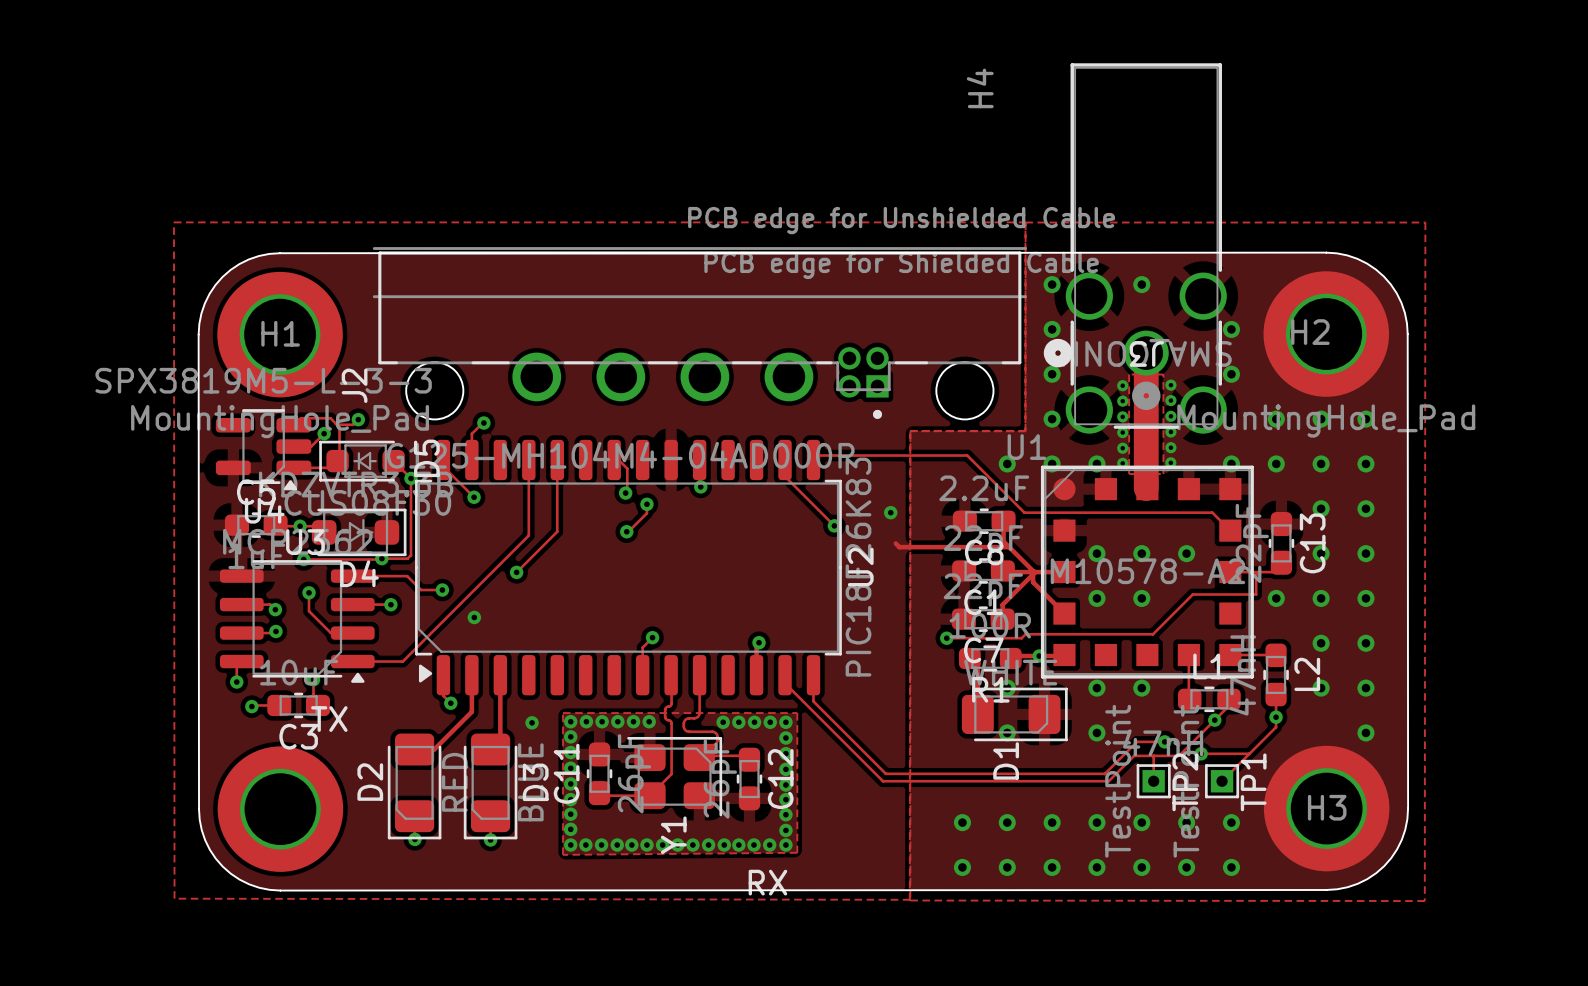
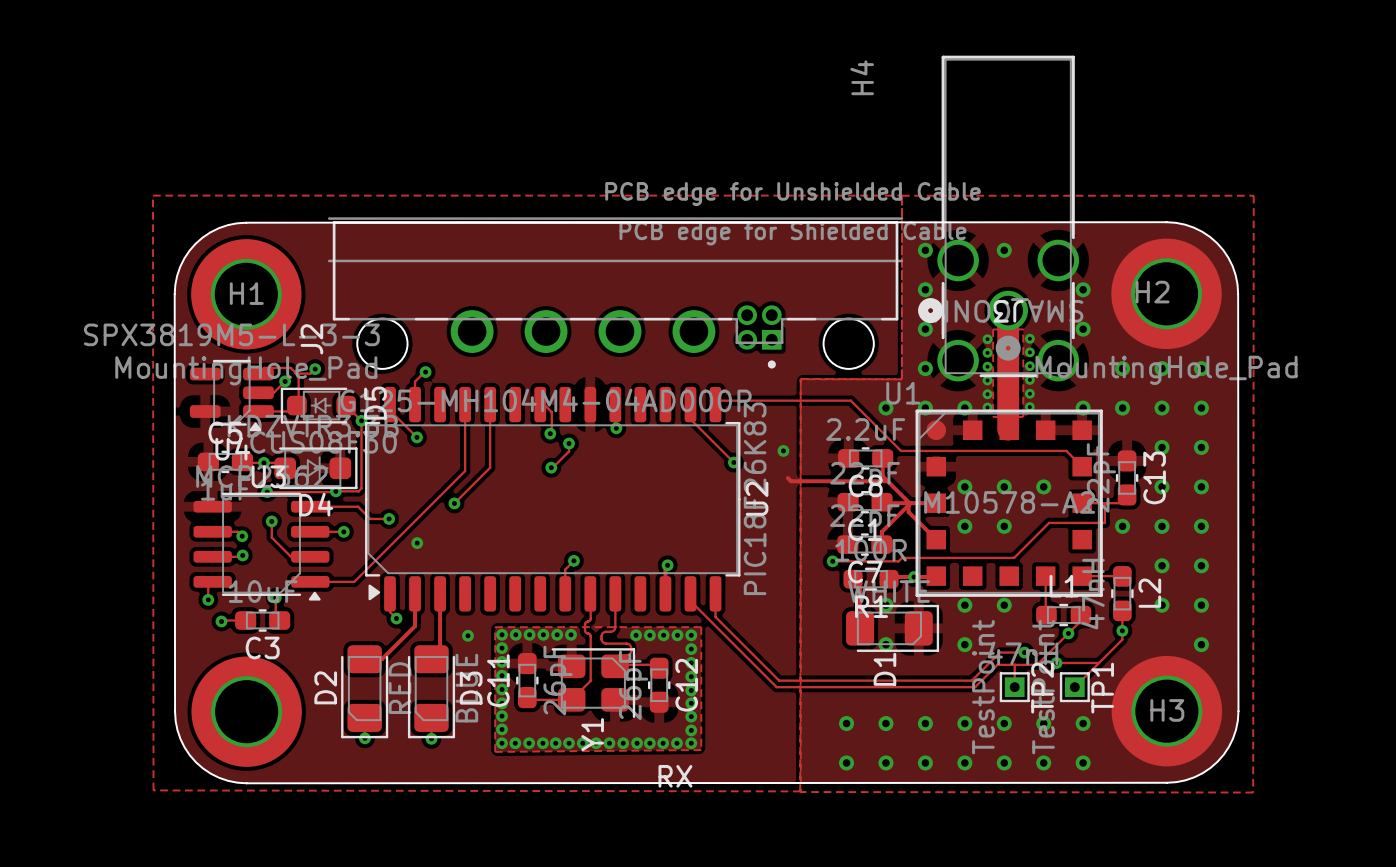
text: TX (329, 719) -> none

